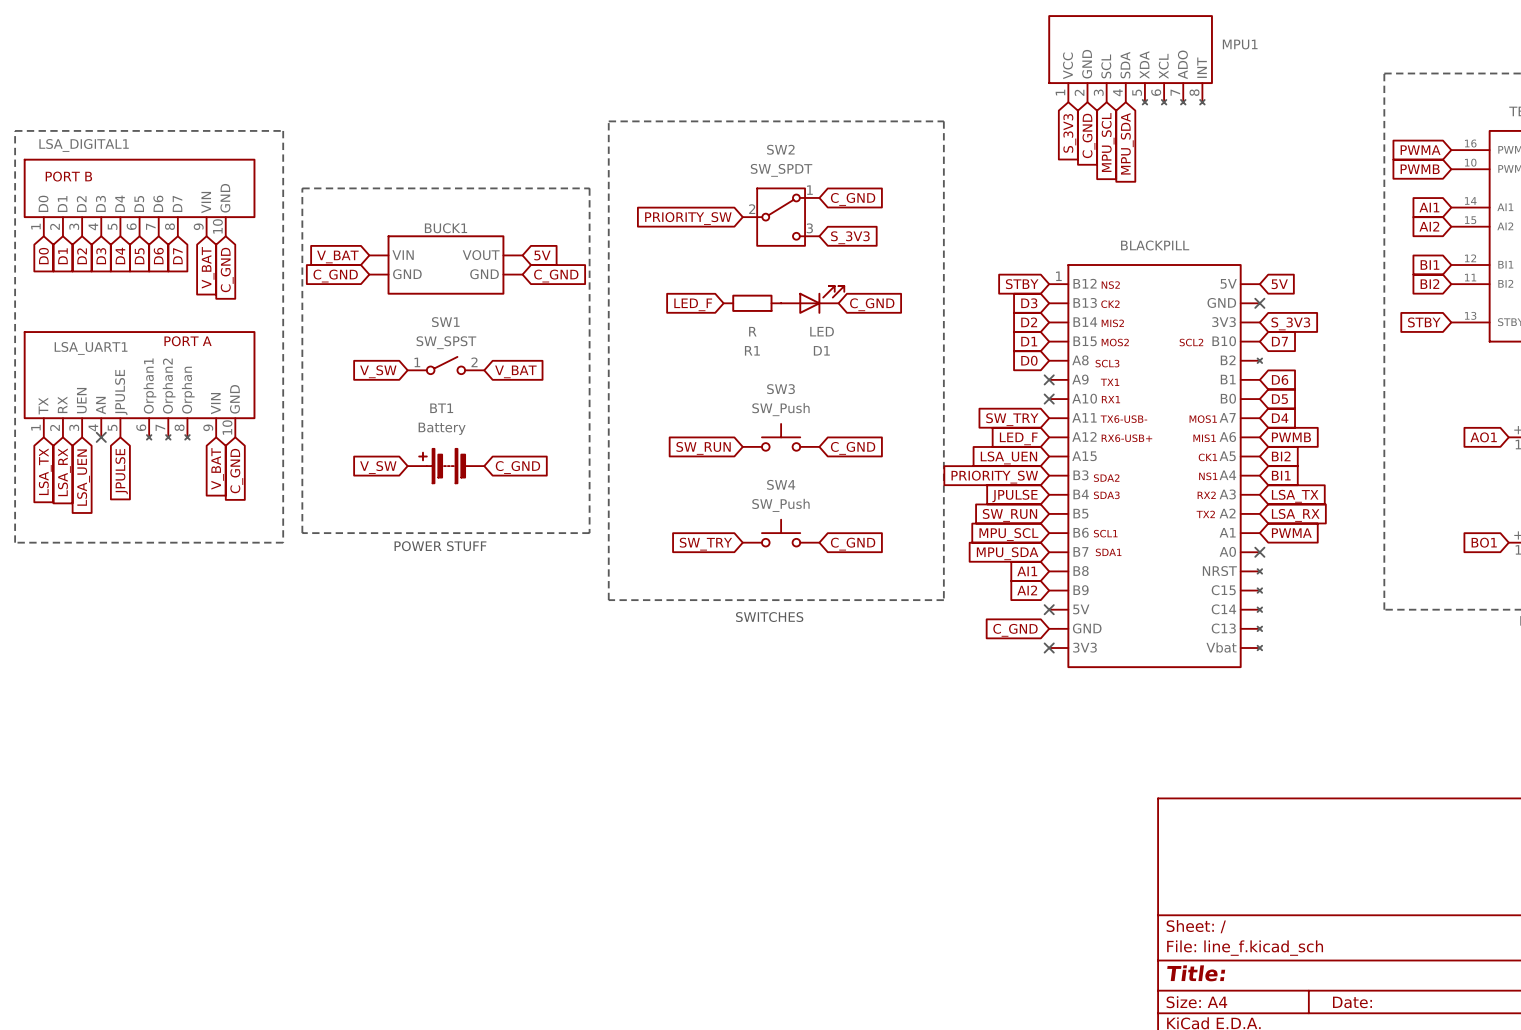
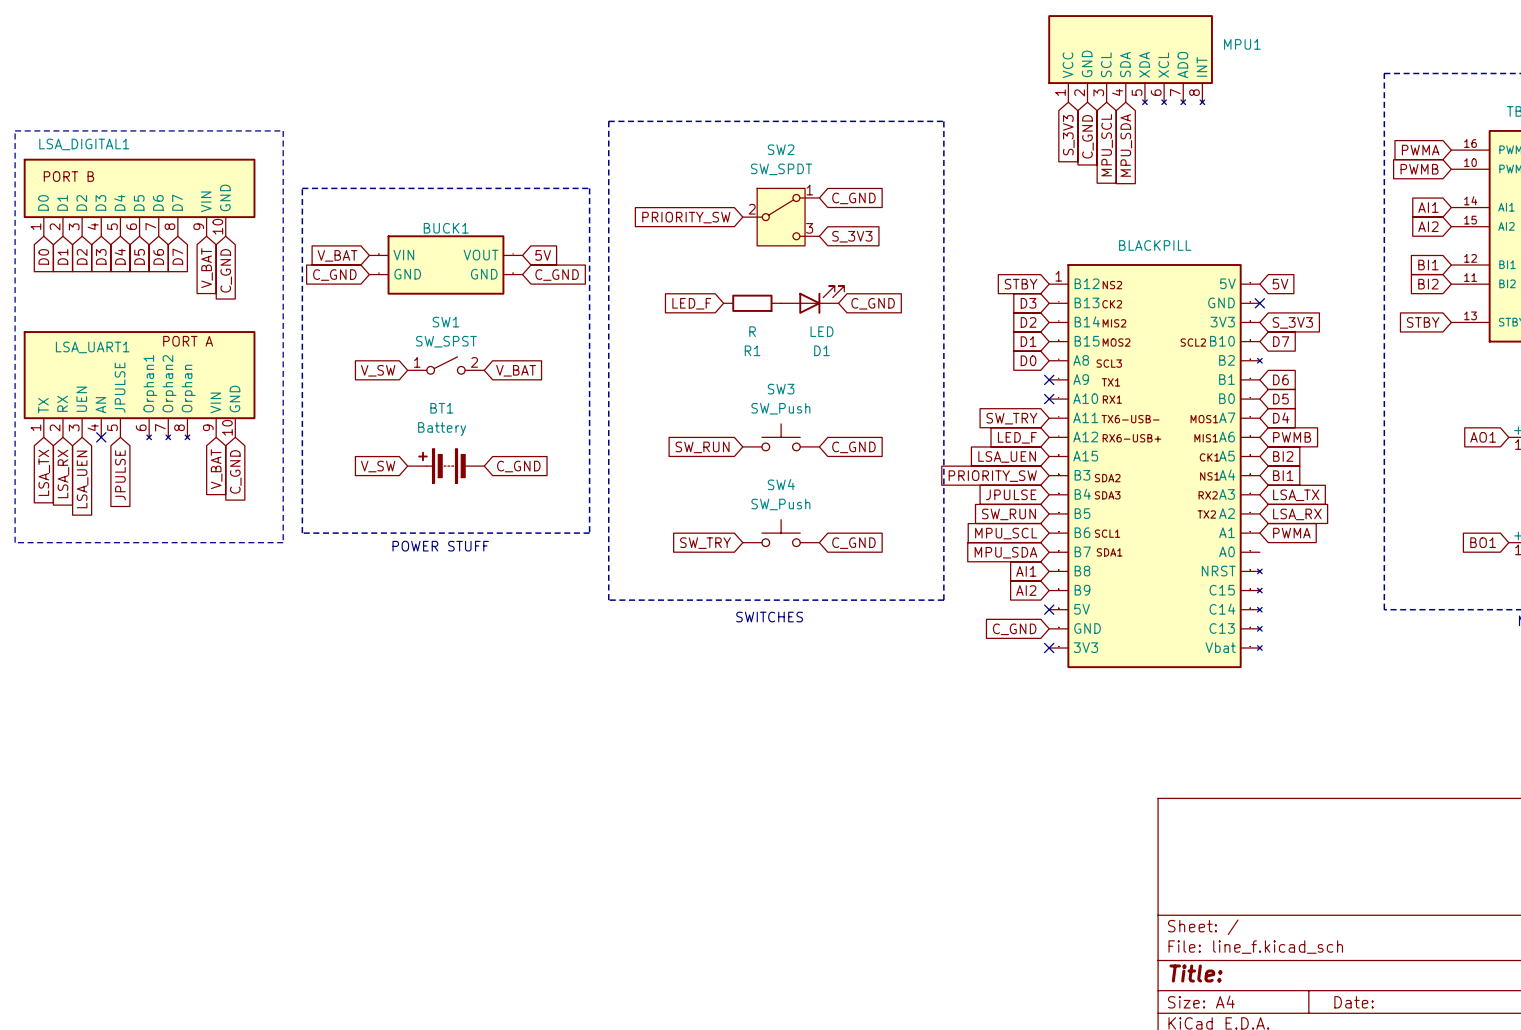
no-connect mark: (1259, 552) -> none

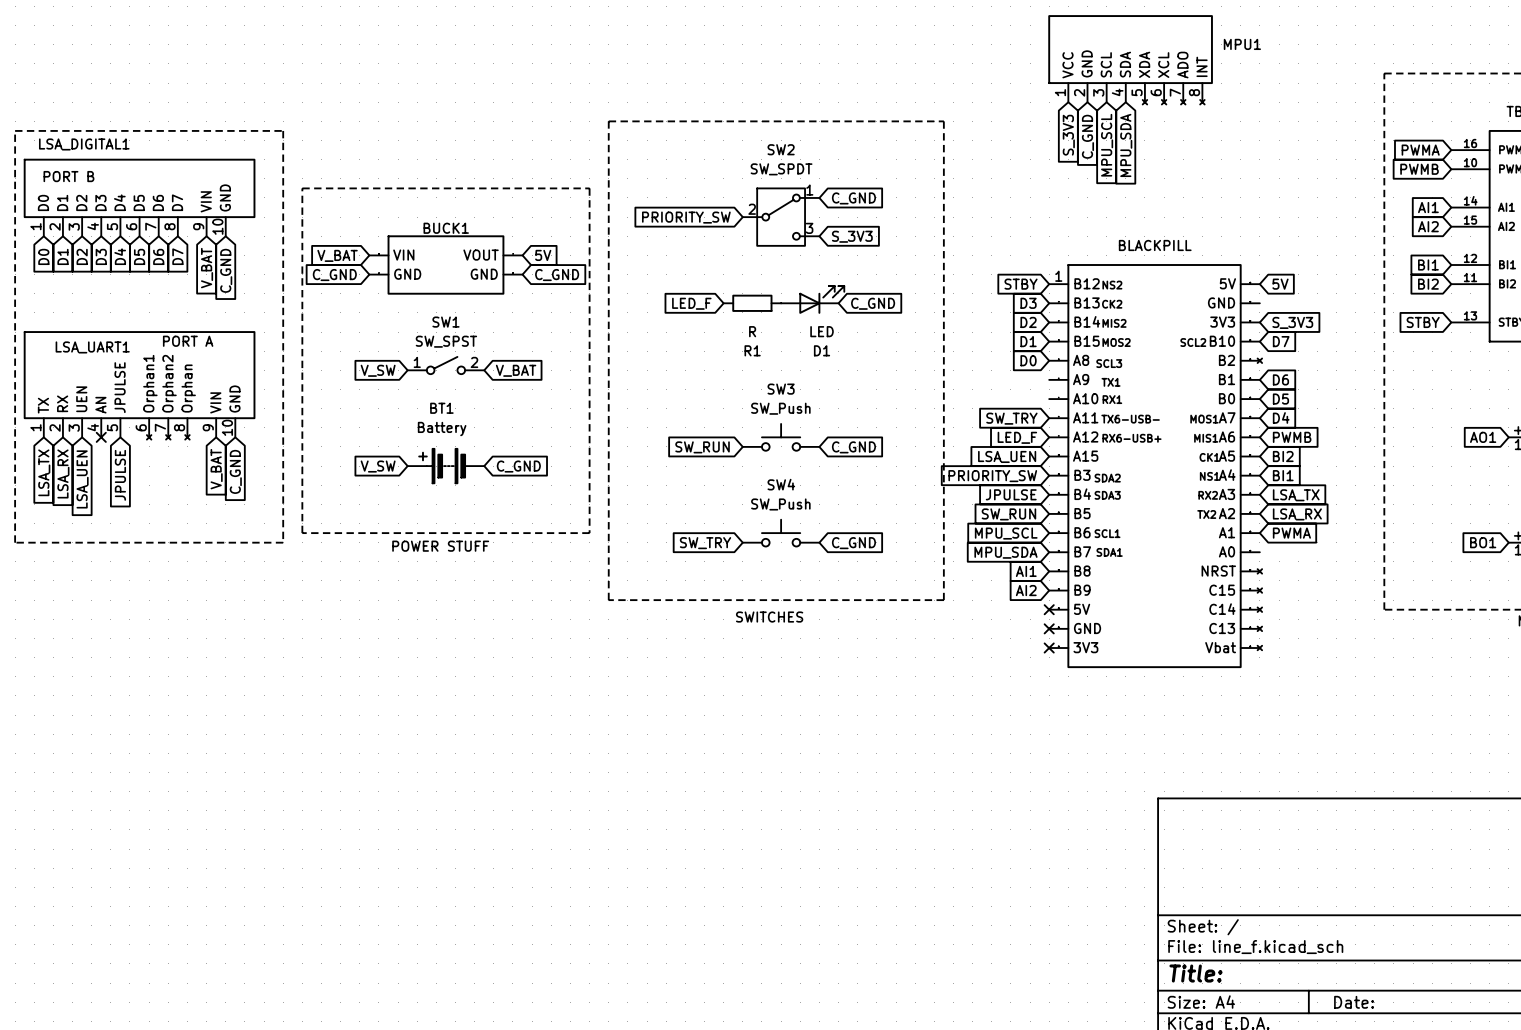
no-connect mark: (1259, 303) -> none
no-connect mark: (1049, 379) -> none
no-connect mark: (1049, 399) -> none
no-connect mark: none -> (1049, 628)
global label: C_GND (1014, 629) -> none

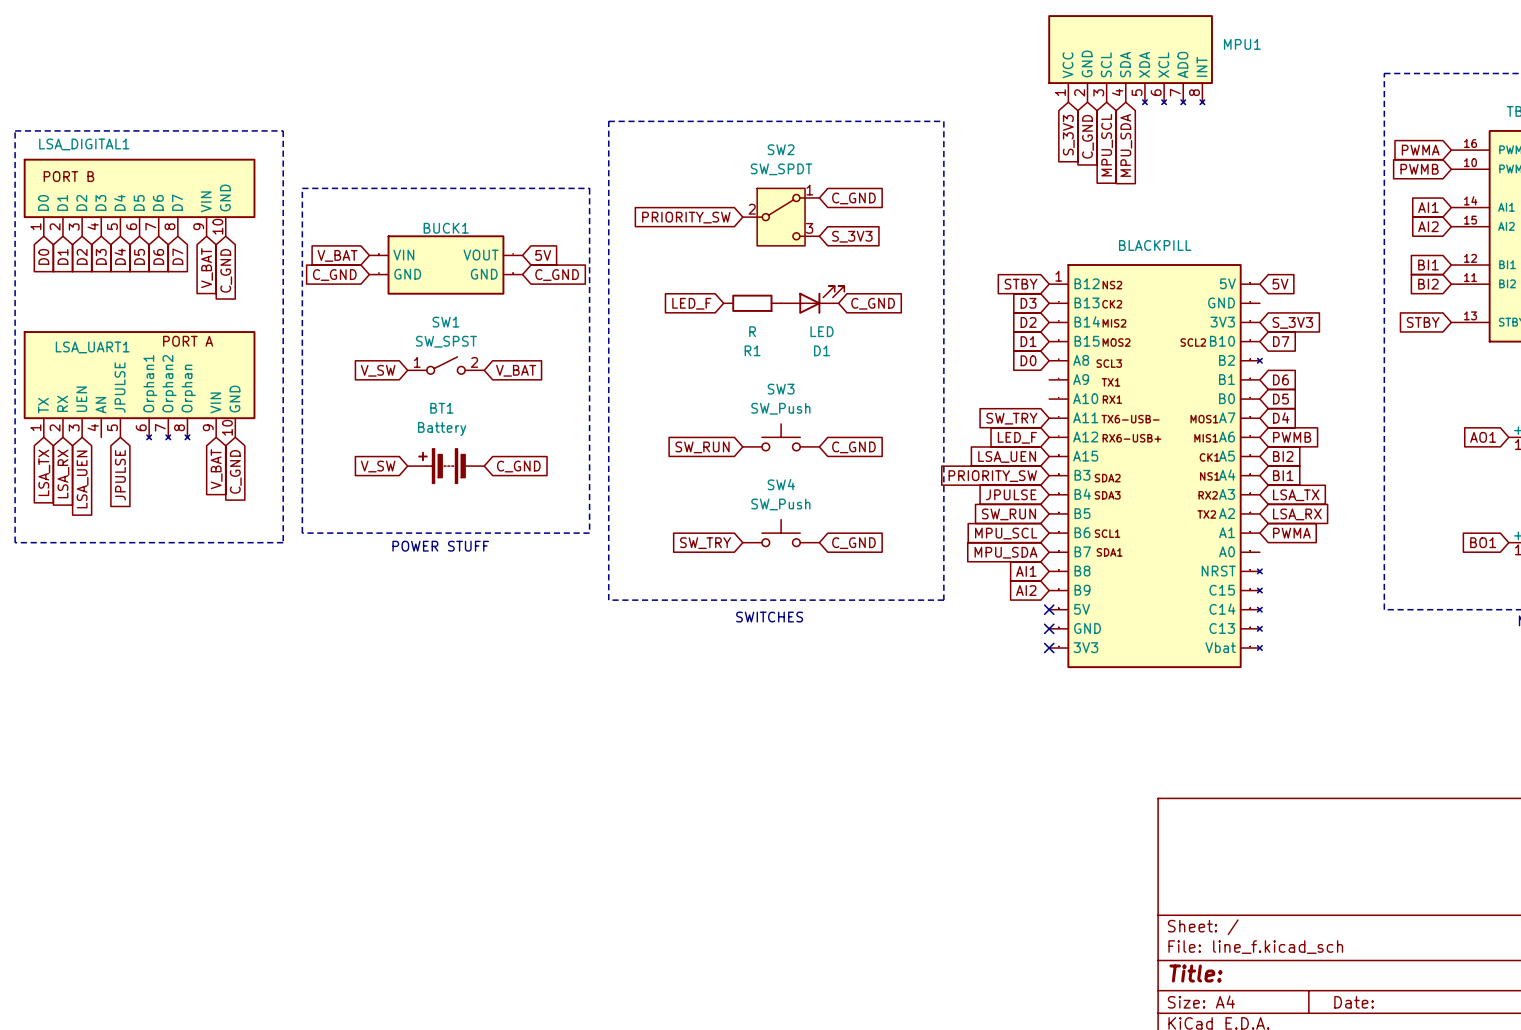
no-connect mark: (101, 437) -> none

